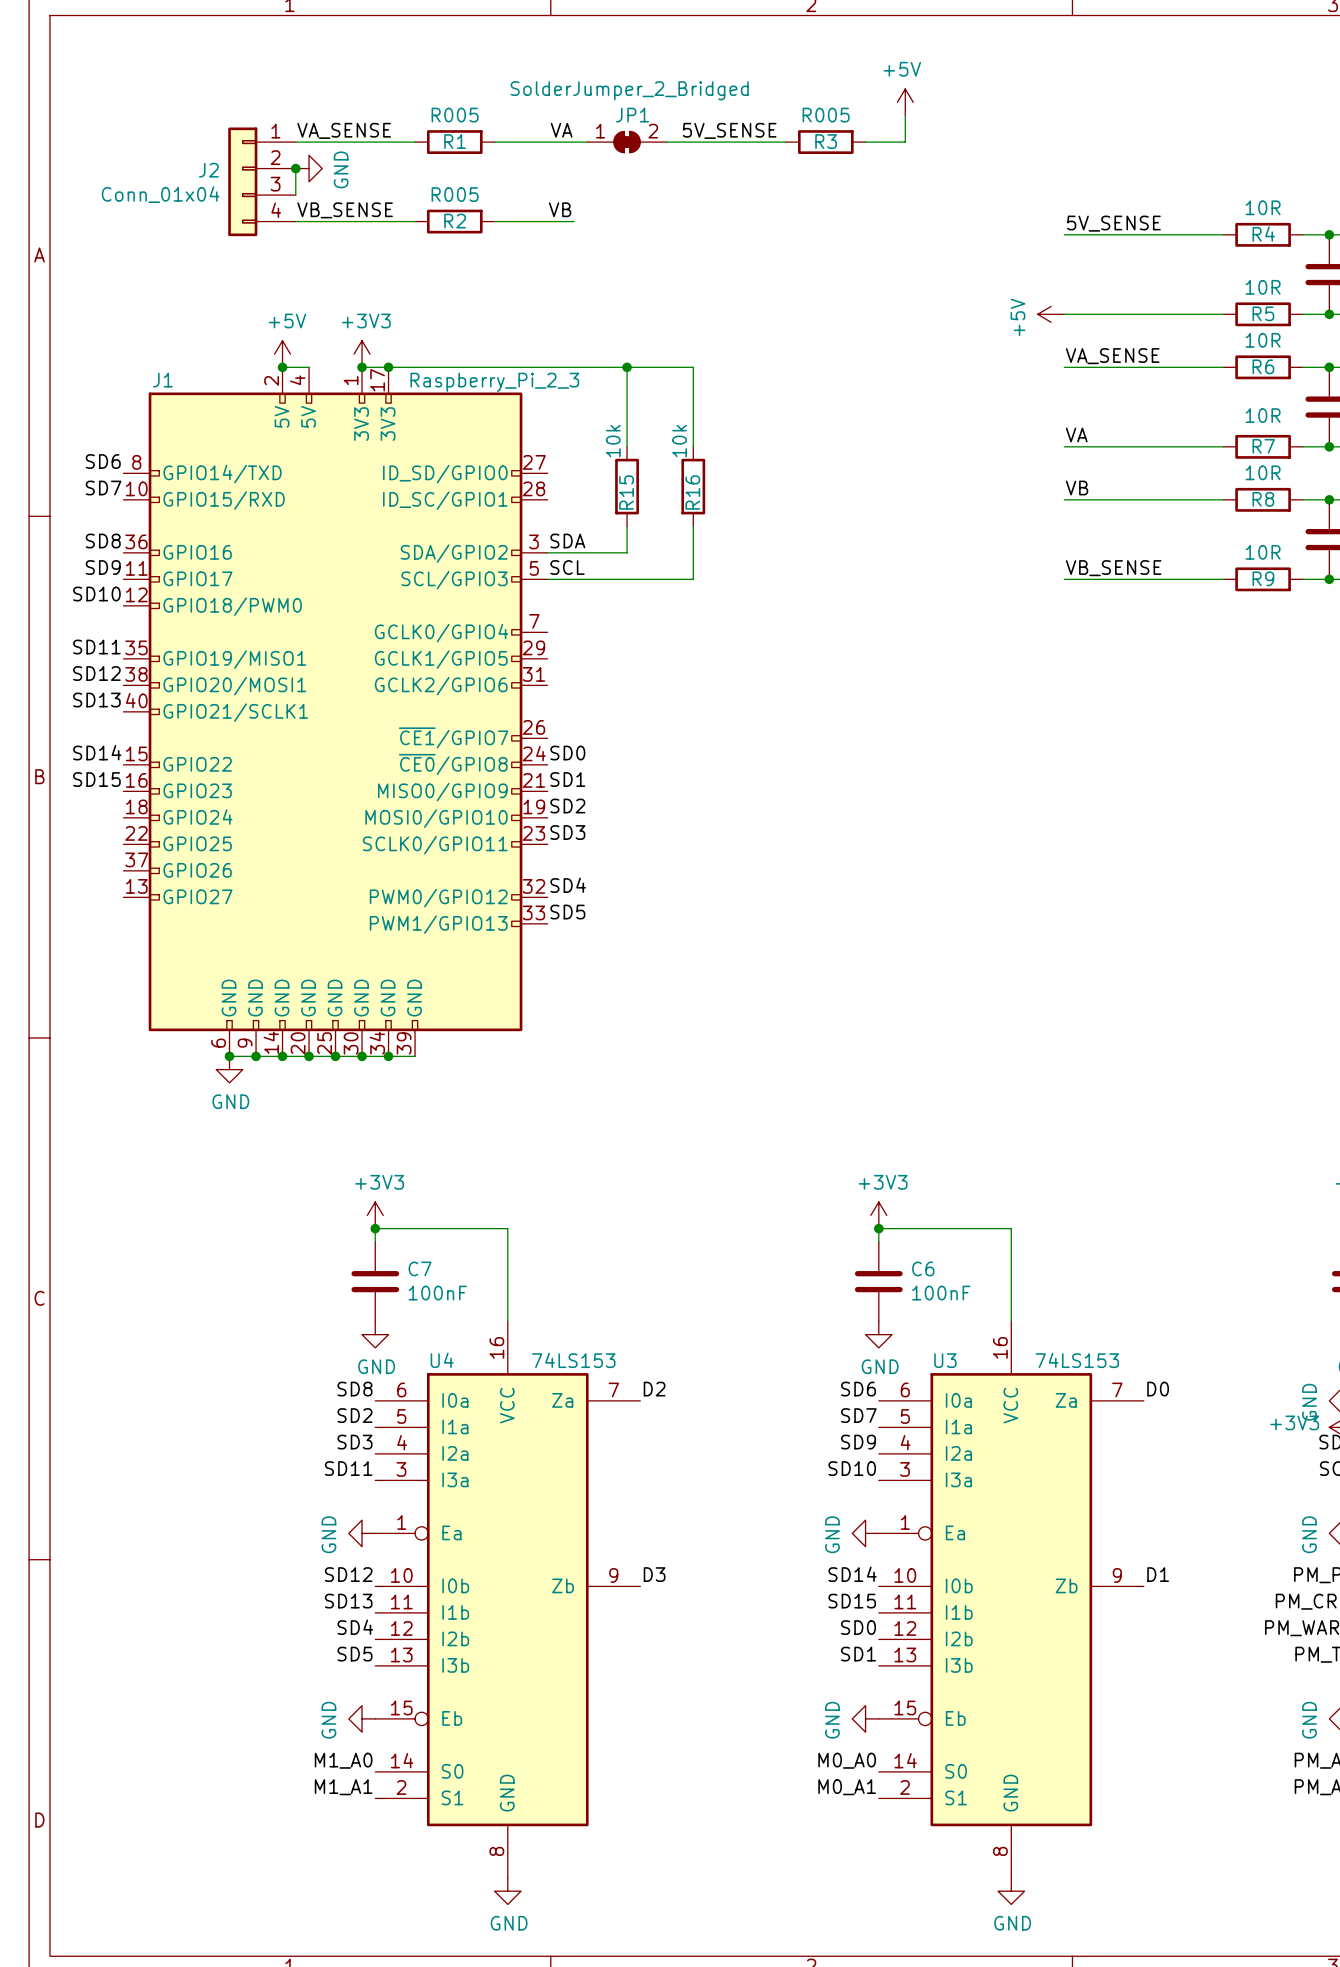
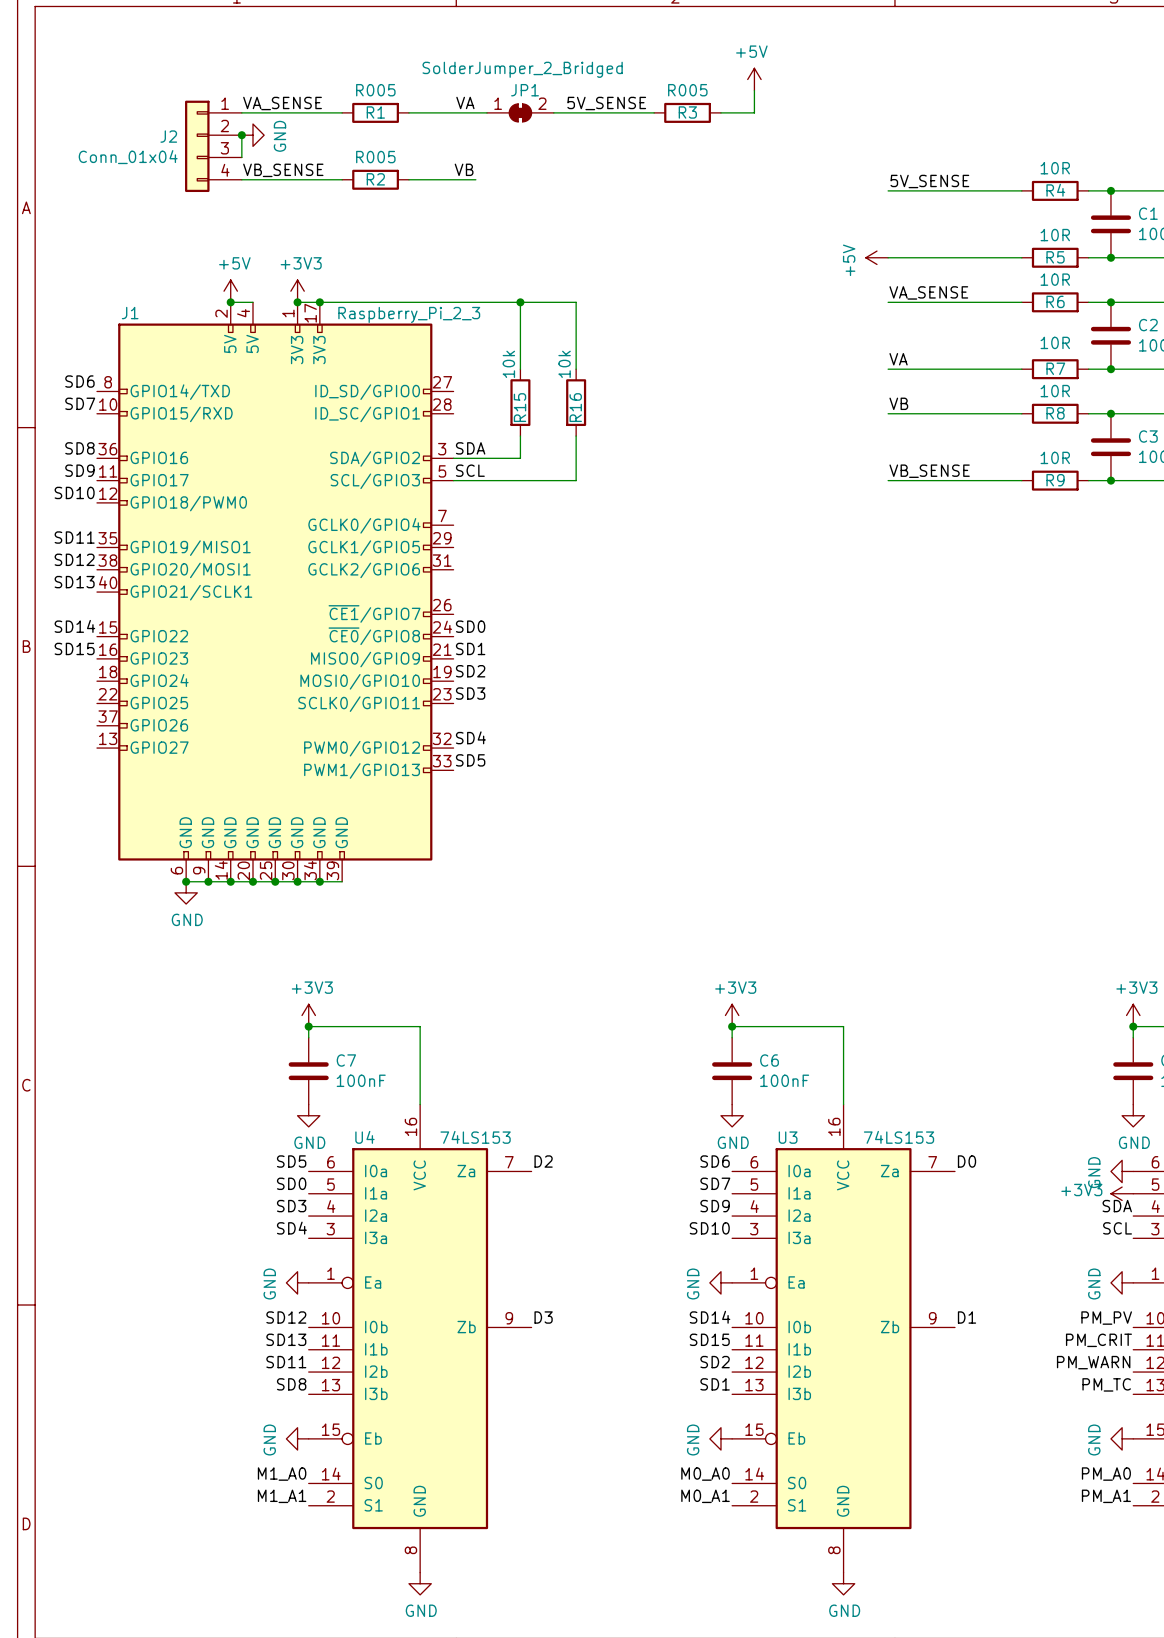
label: SD8 (354, 1389) -> SD5 (291, 1161)
label: SD2 (354, 1415) -> SD0 (291, 1183)
label: SD11 (348, 1468) -> SD4 (291, 1228)
label: SD4 (355, 1627) -> SD11 (286, 1362)
label: SD0 (858, 1627) -> SD2 (715, 1362)
label: SD5 (354, 1654) -> SD8 (291, 1384)

